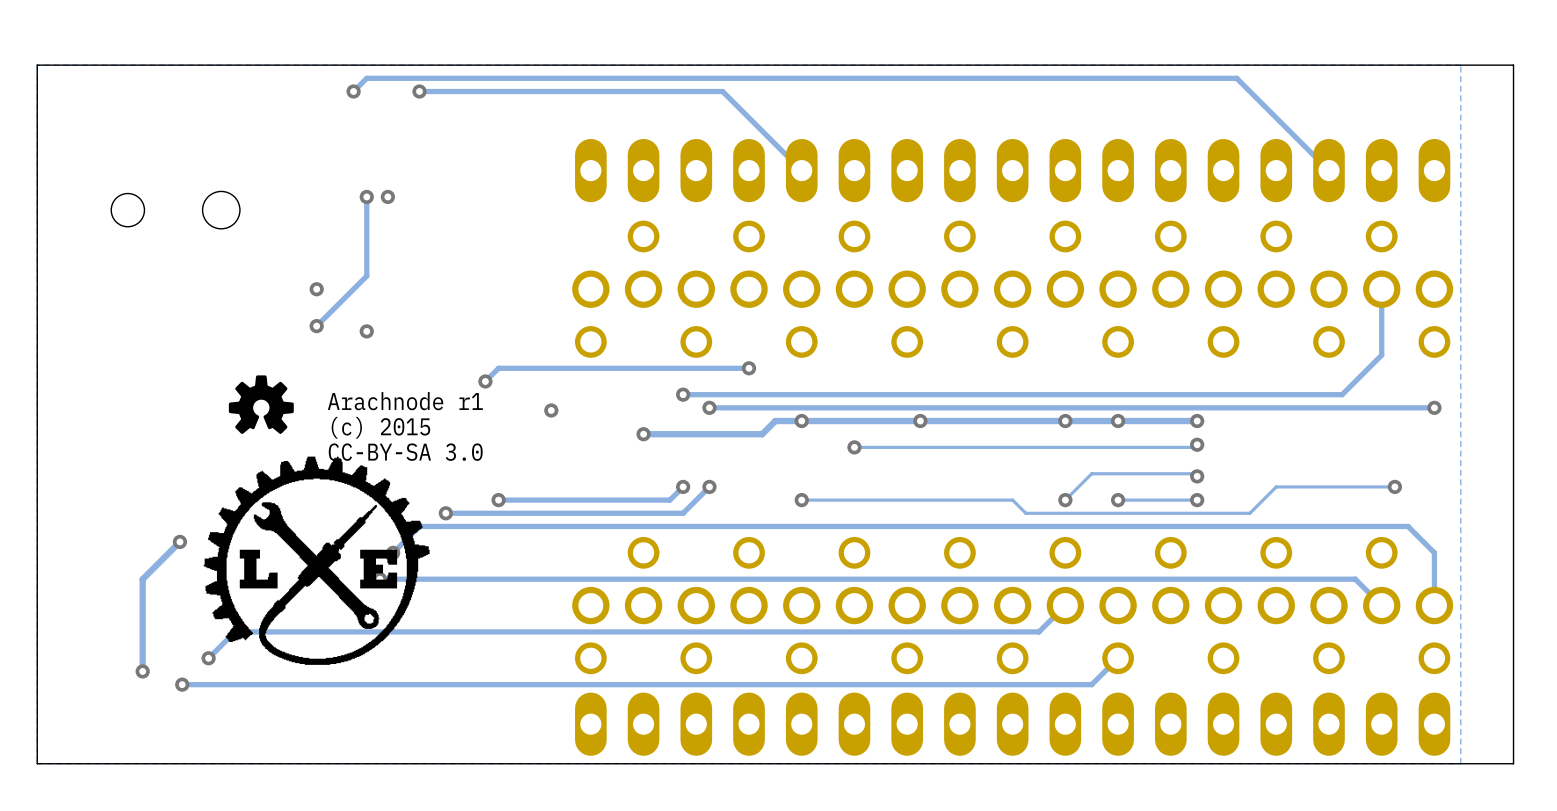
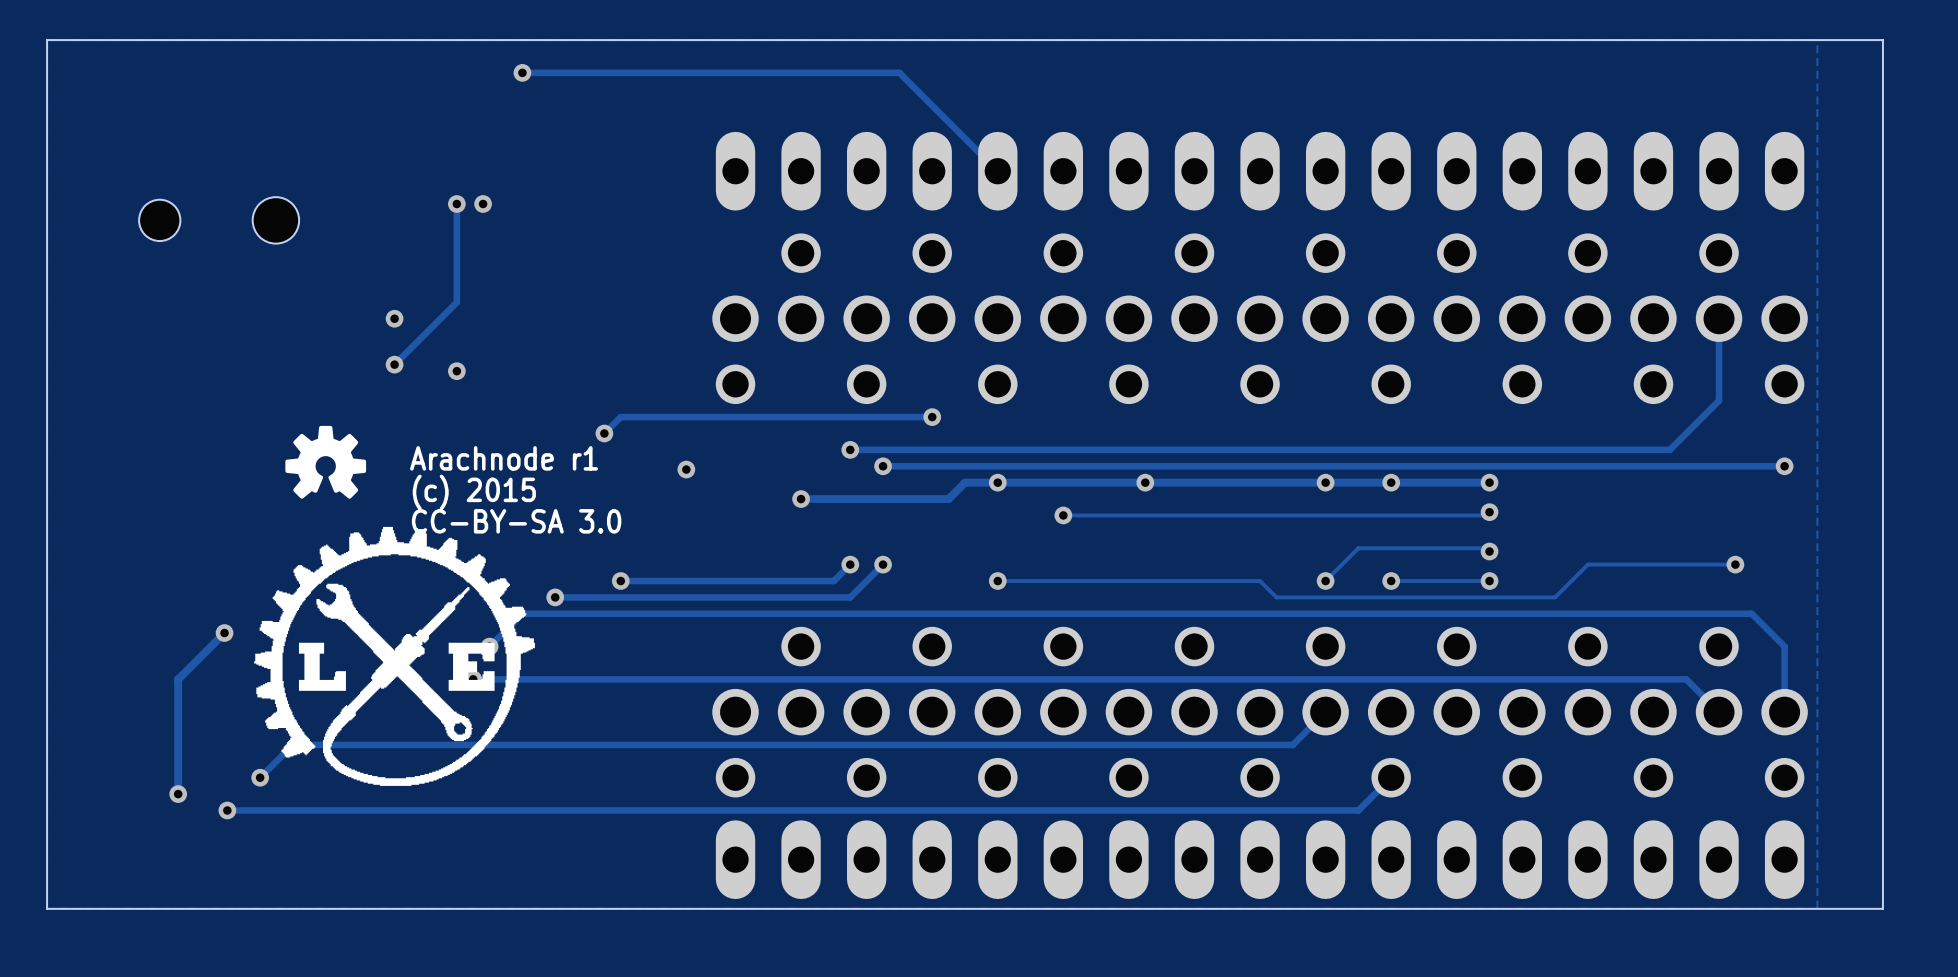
track: (353, 91) (366, 78) (1236, 78) (1328, 170) -> none
via: (353, 91) -> none

